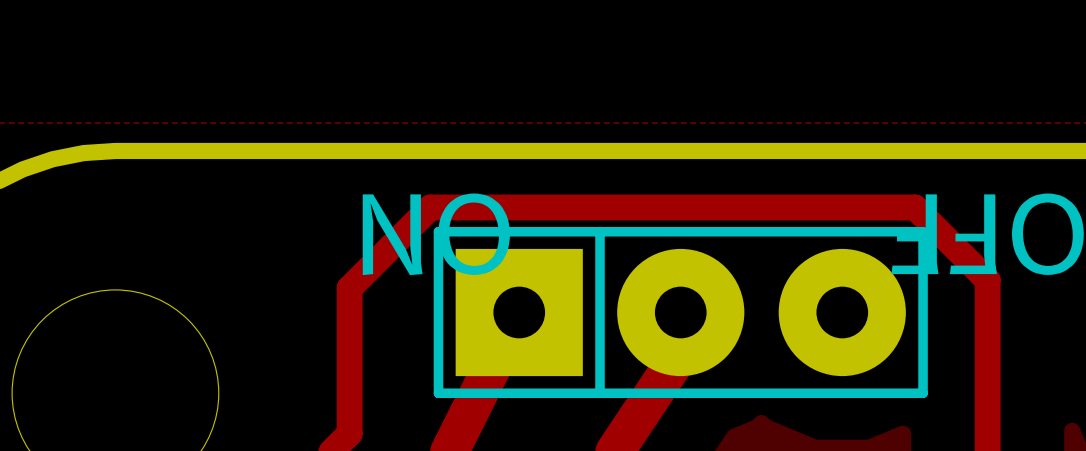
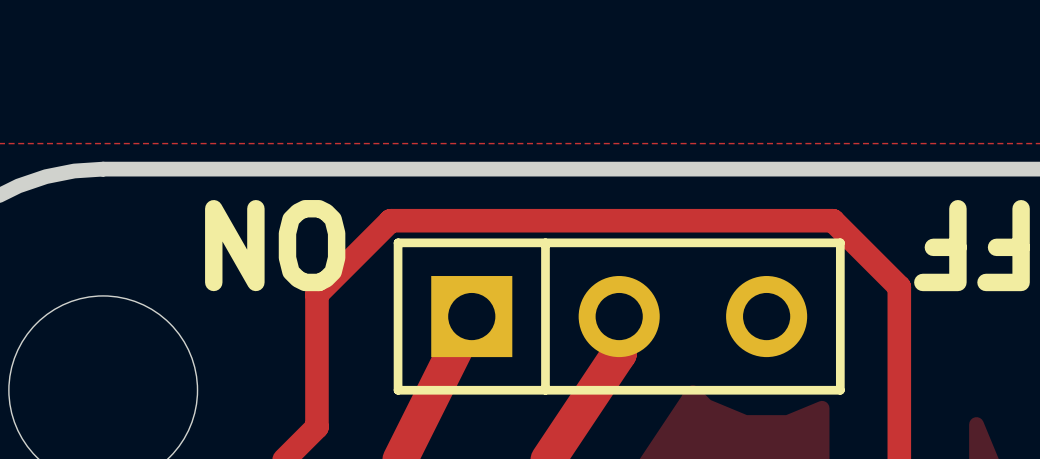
part footprint: [433, 226, 928, 399] -> [393, 238, 845, 395]

